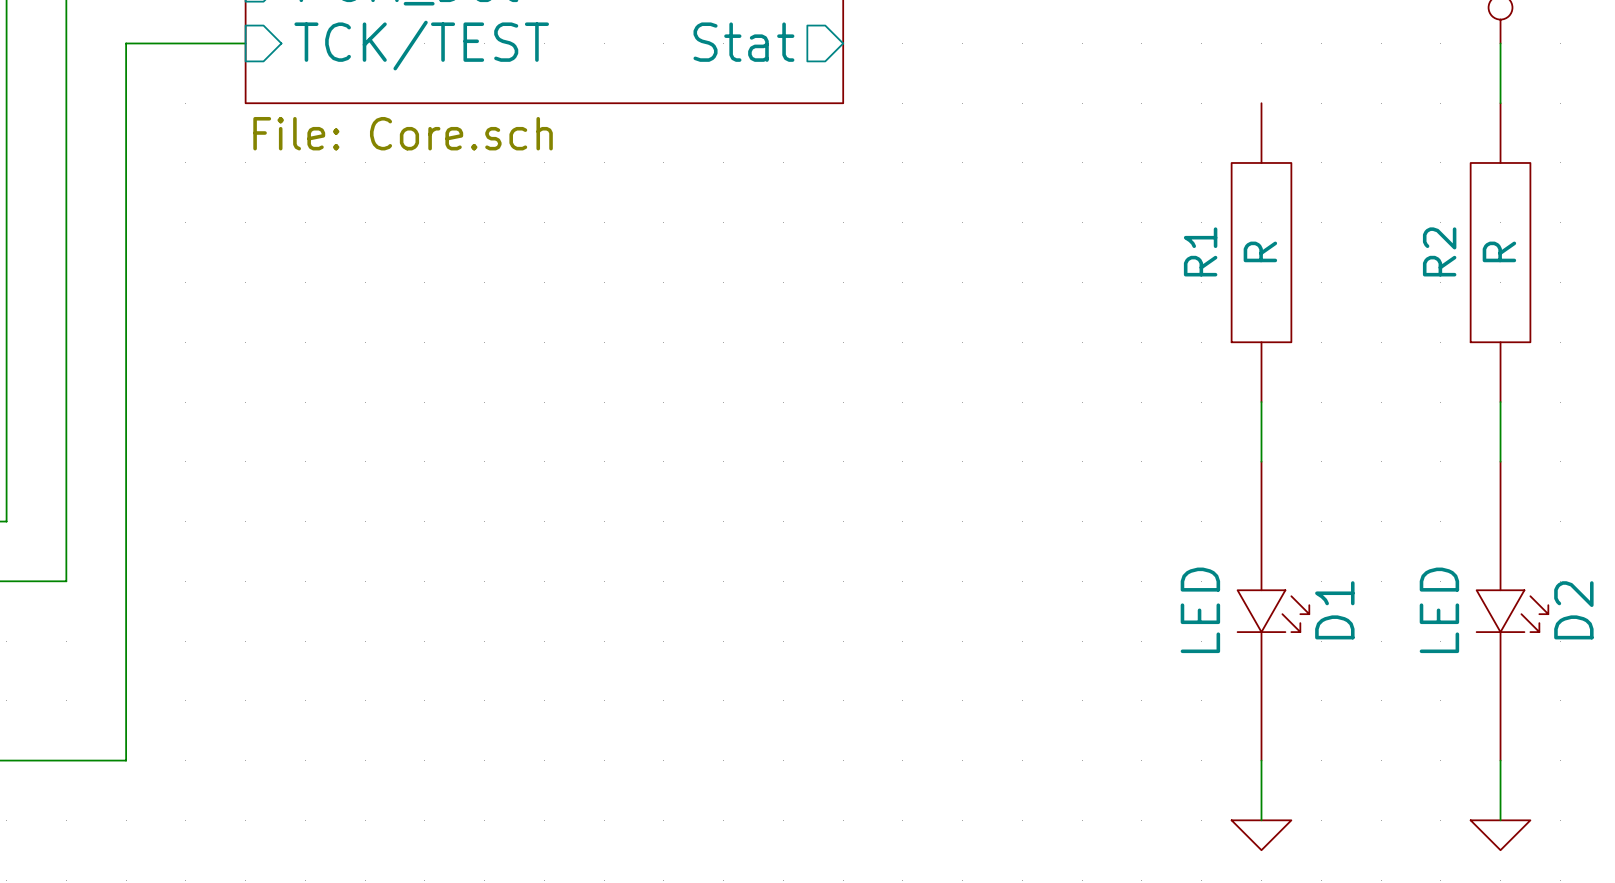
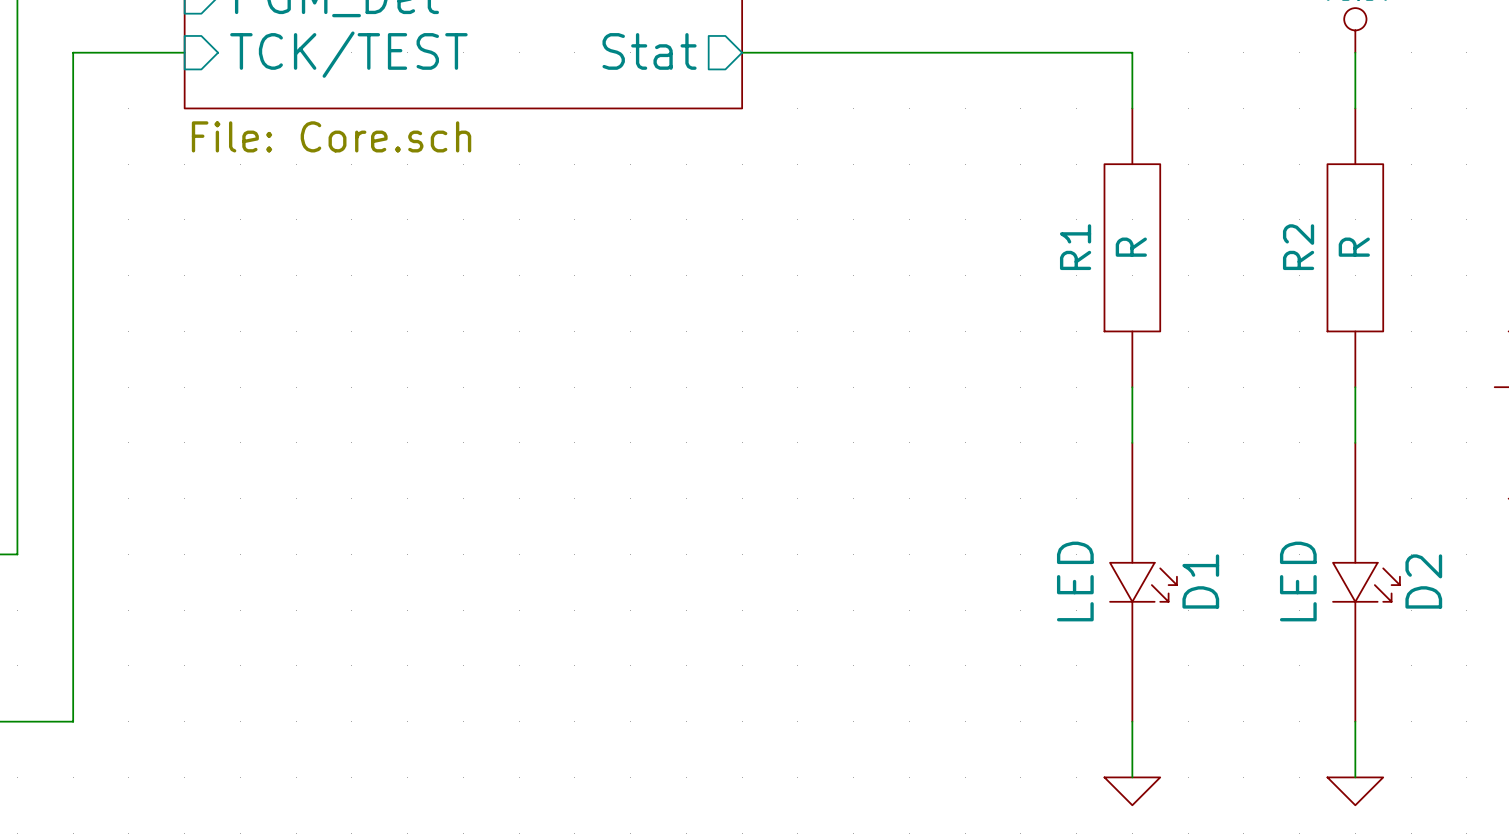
wire: none -> (742, 52) (1132, 52) (1132, 108)

